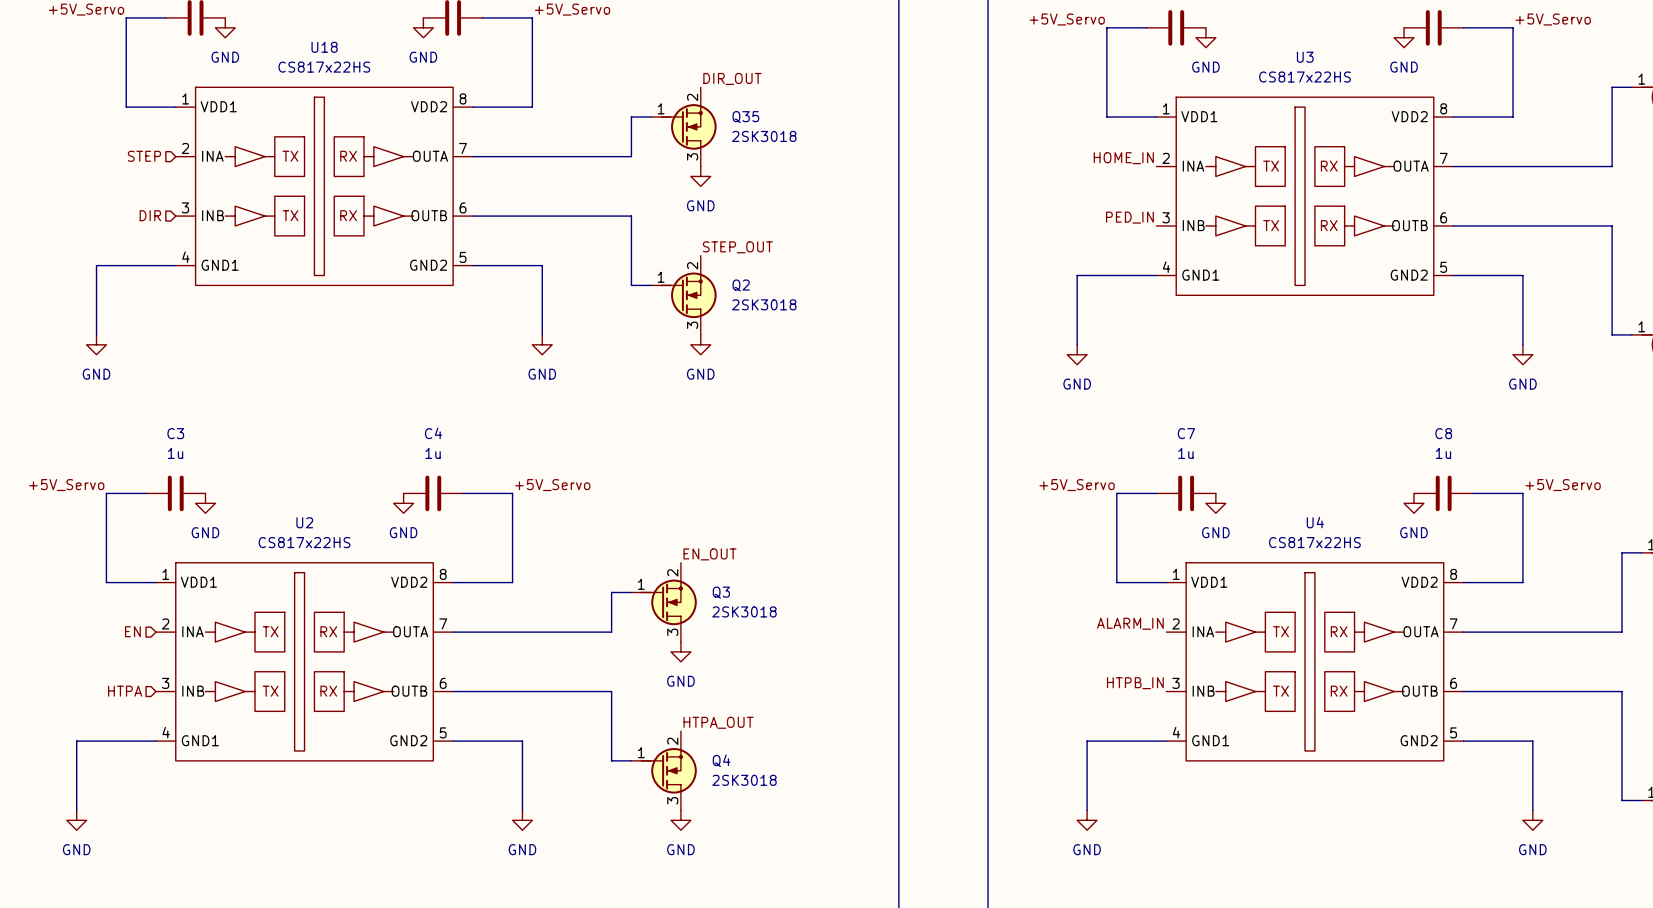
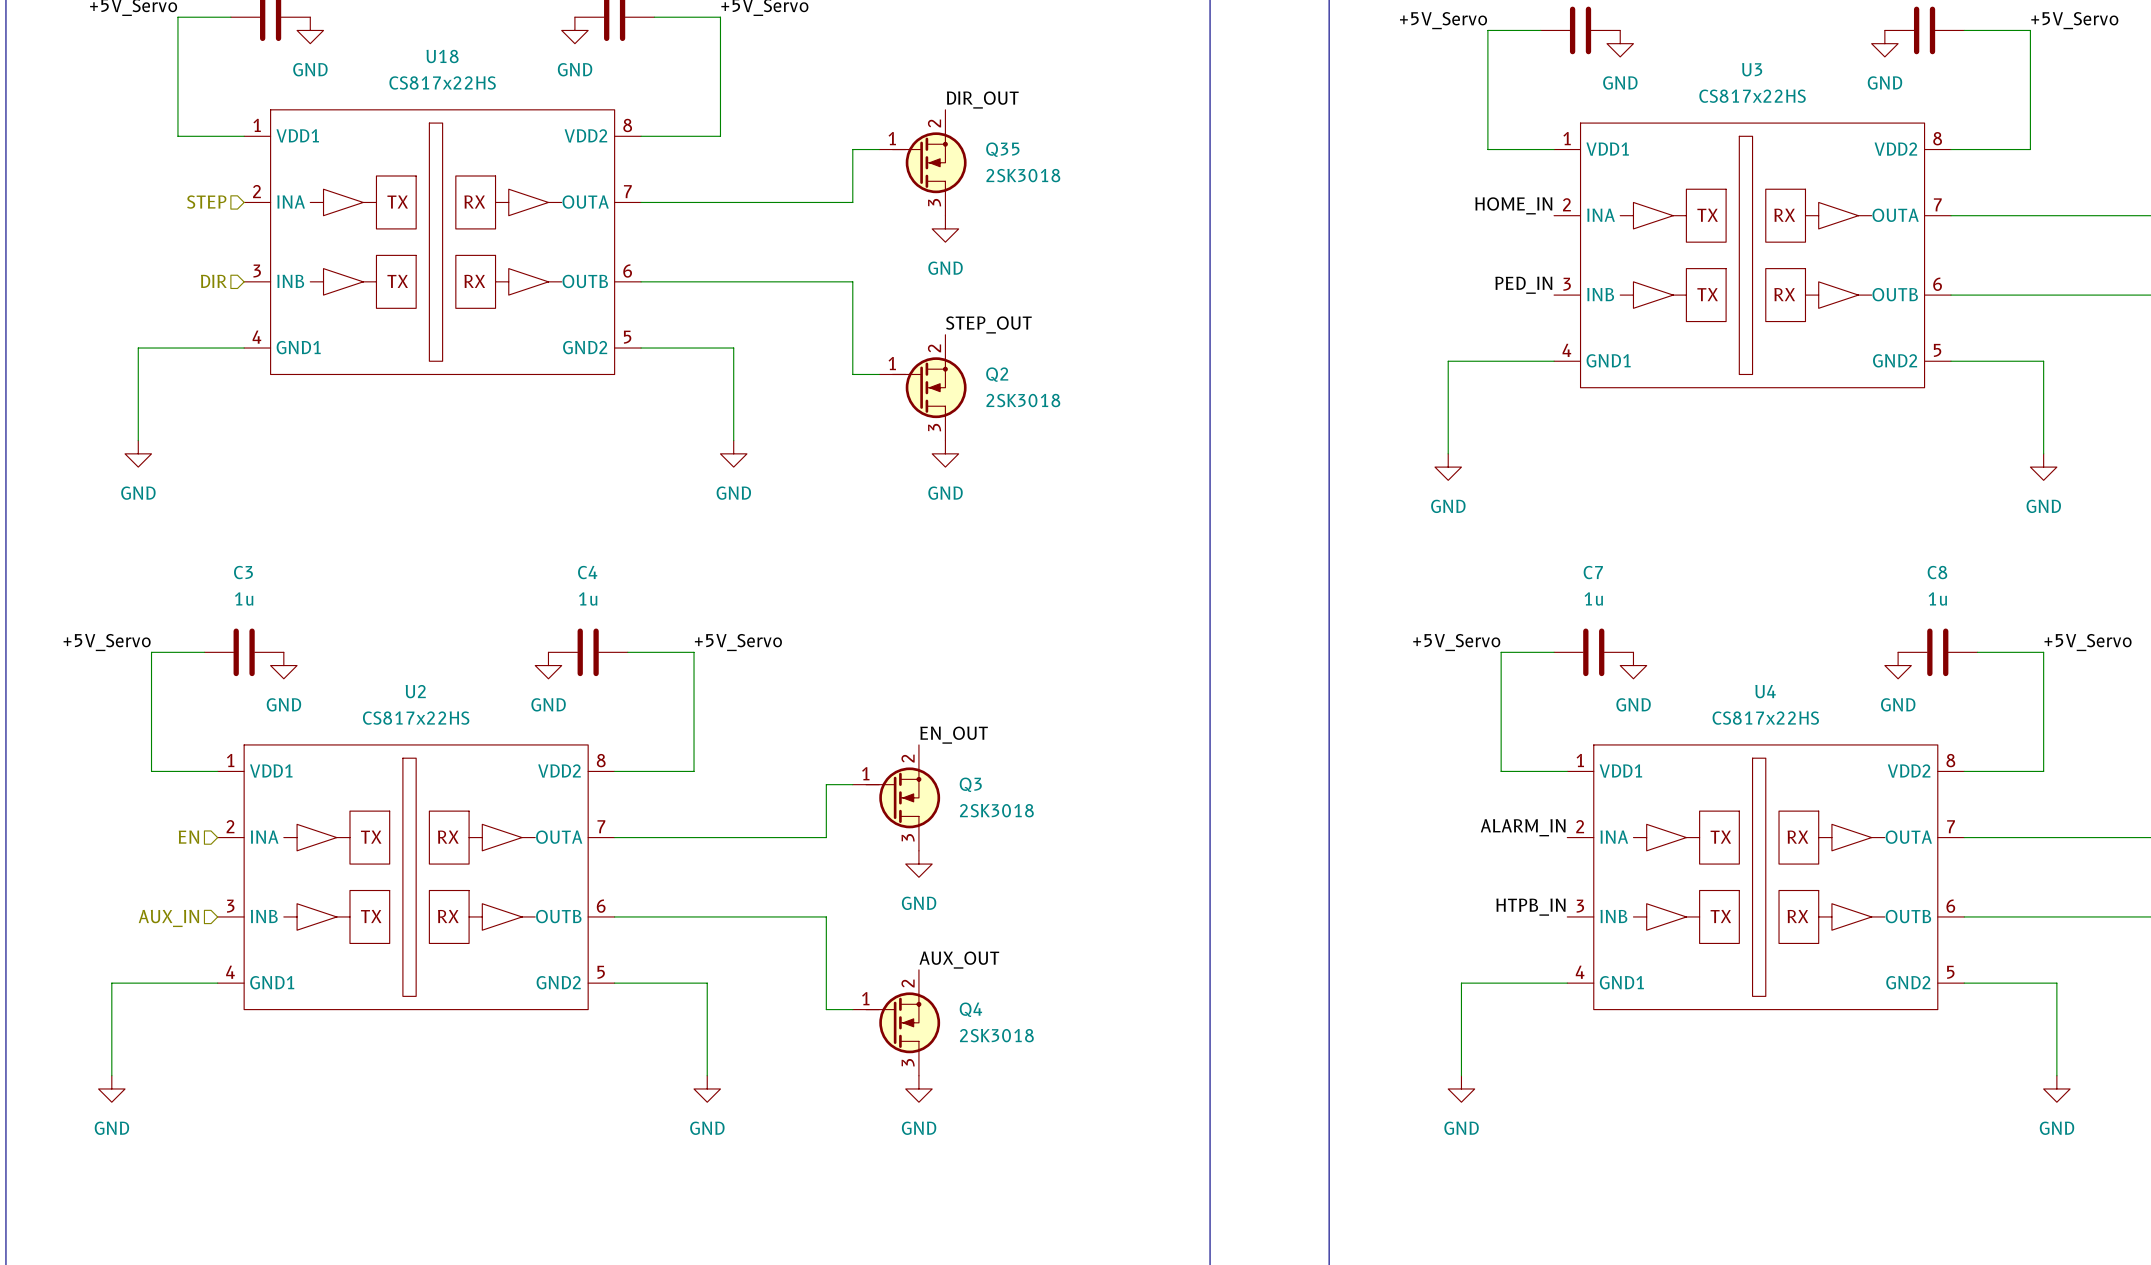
hierarchical label: HTPA (125, 691) -> AUX_IN (168, 918)
label: HTPA_OUT (718, 722) -> AUX_OUT (959, 960)

